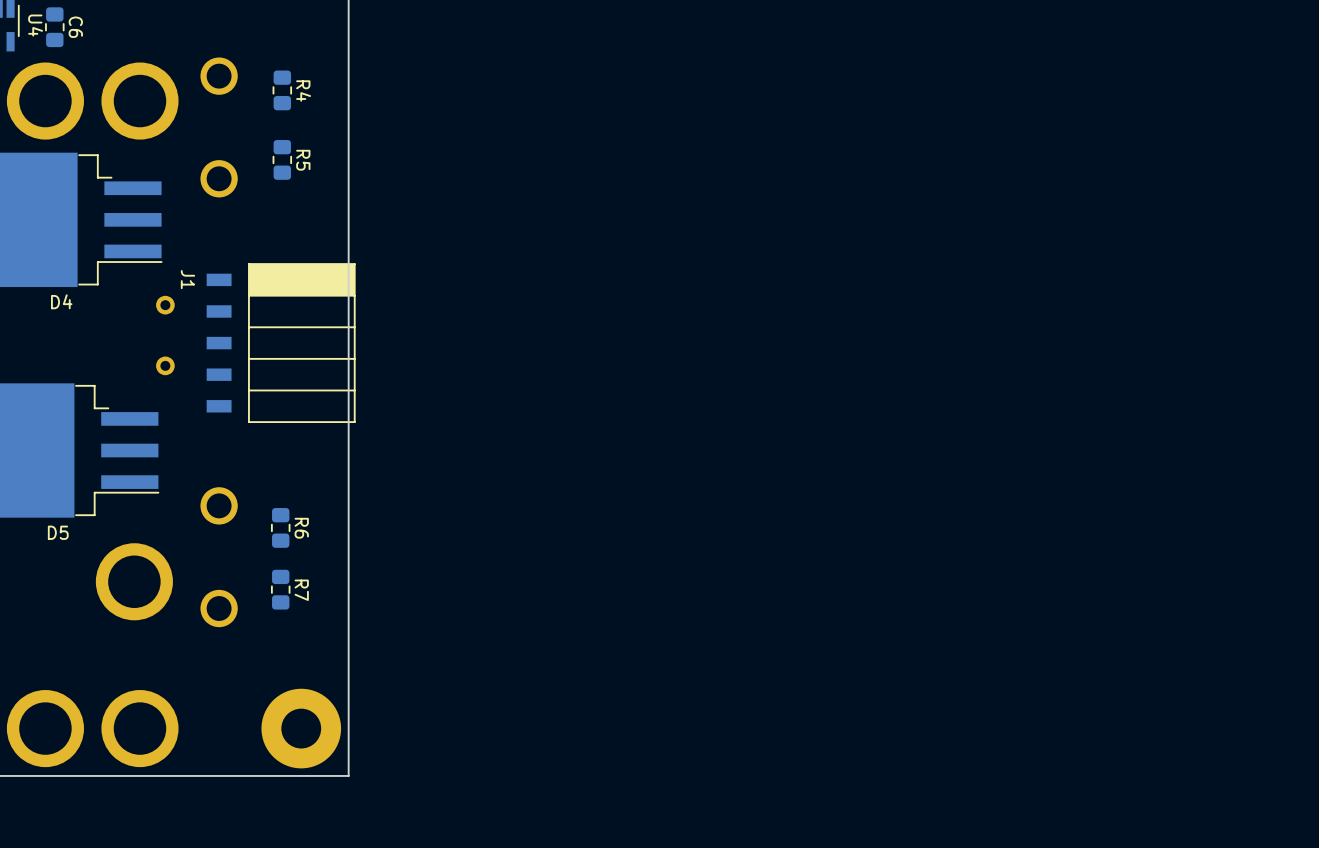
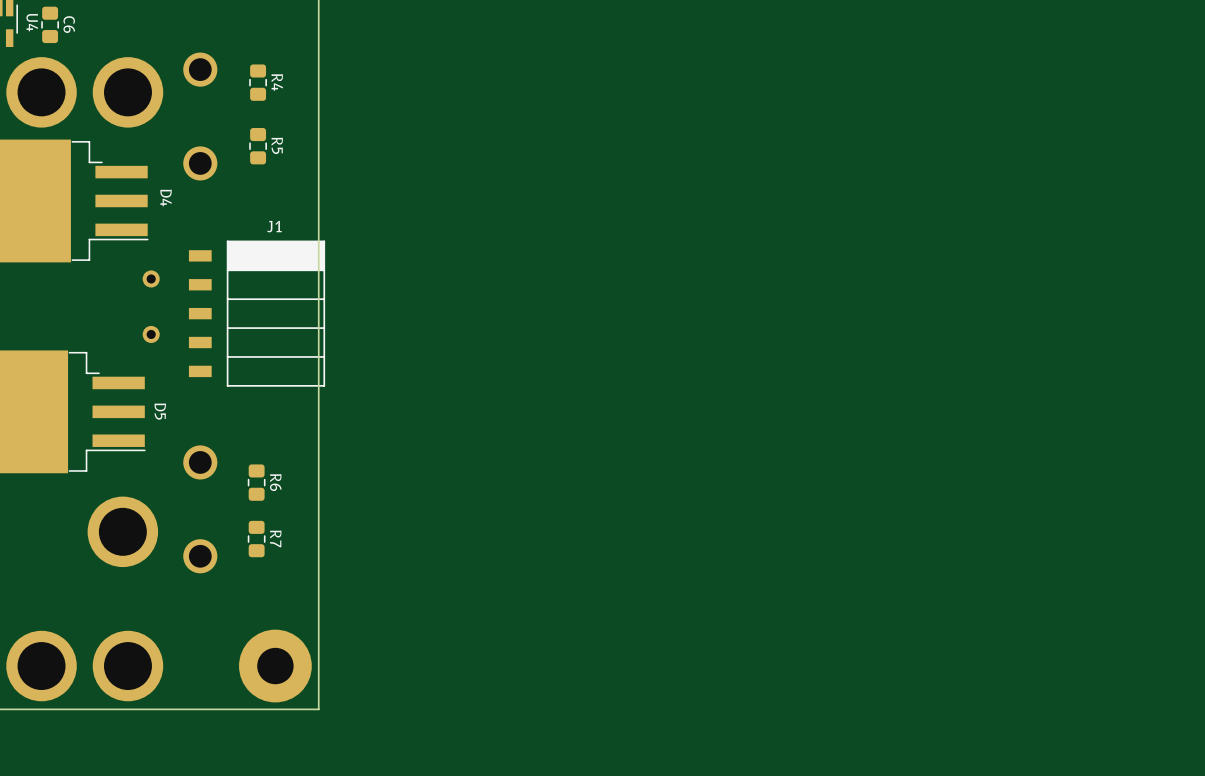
J1 name rotation: 0° (187, 279) -> 90° counterclockwise (274, 226)
J1 name position: J1 (187, 279) -> J1 (274, 226)
D4 name rotation: 0° (61, 301) -> 90° clockwise (166, 197)
D4 name position: D4 (61, 301) -> D4 (166, 197)
D5 name rotation: 0° (58, 532) -> 90° clockwise (160, 411)
D5 name position: D5 (58, 532) -> D5 (160, 411)

